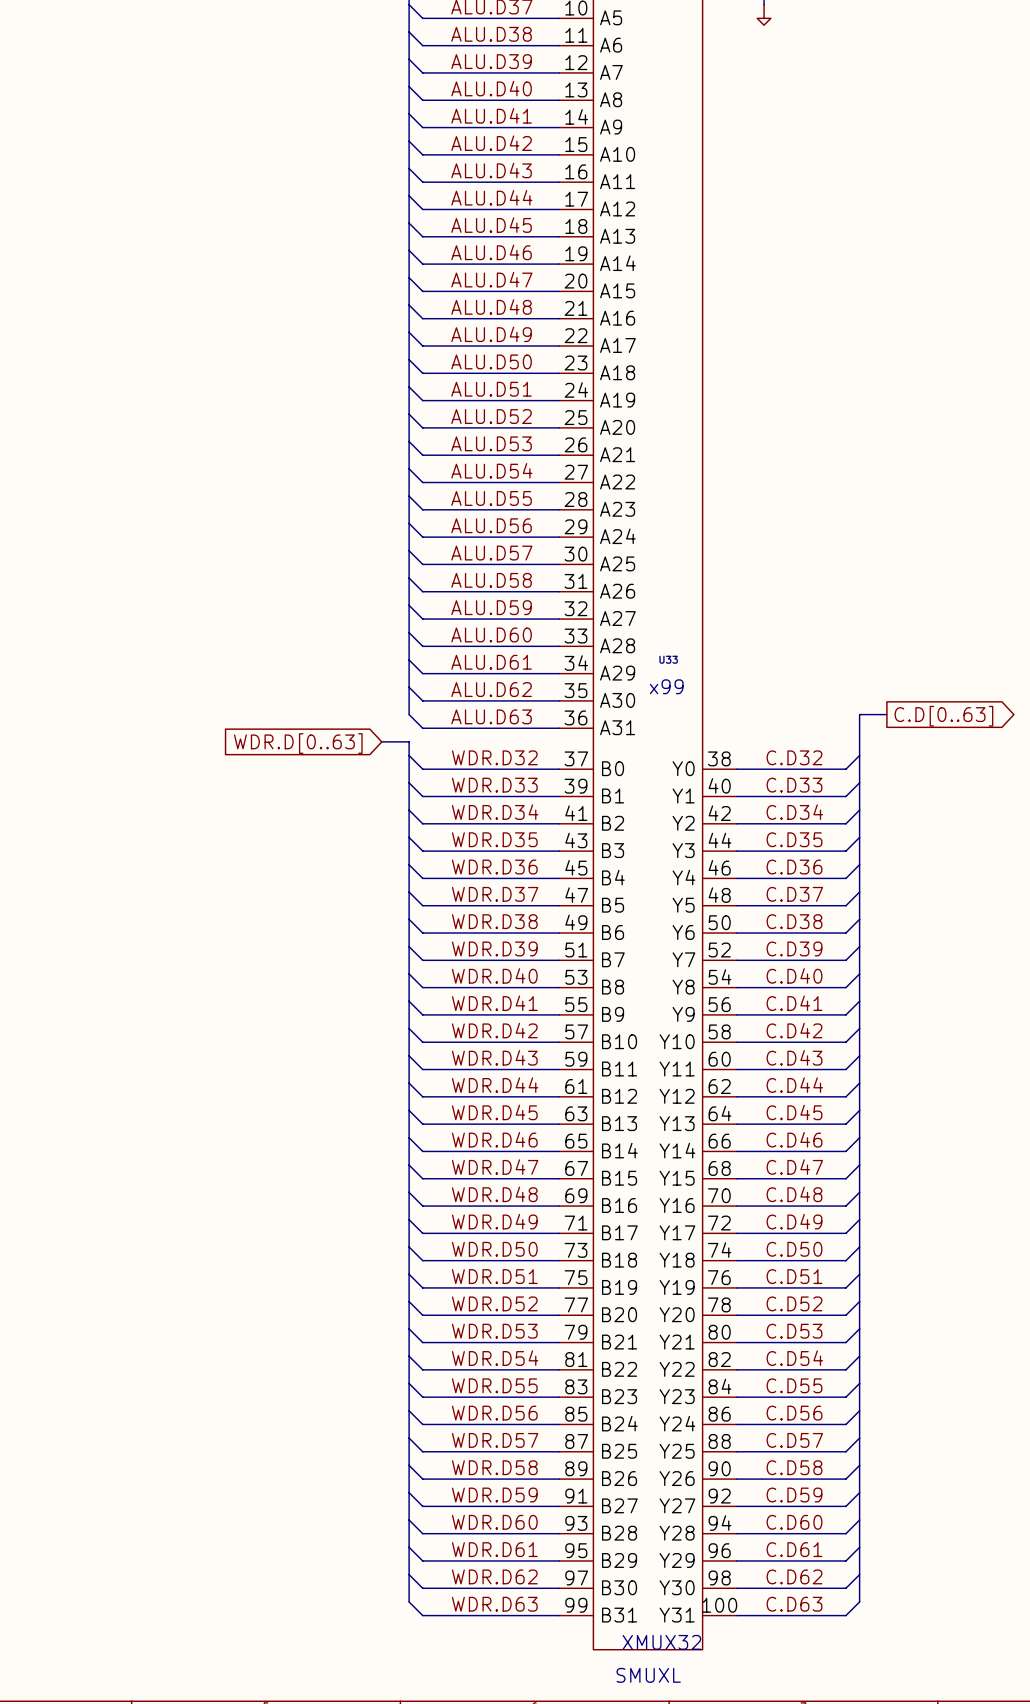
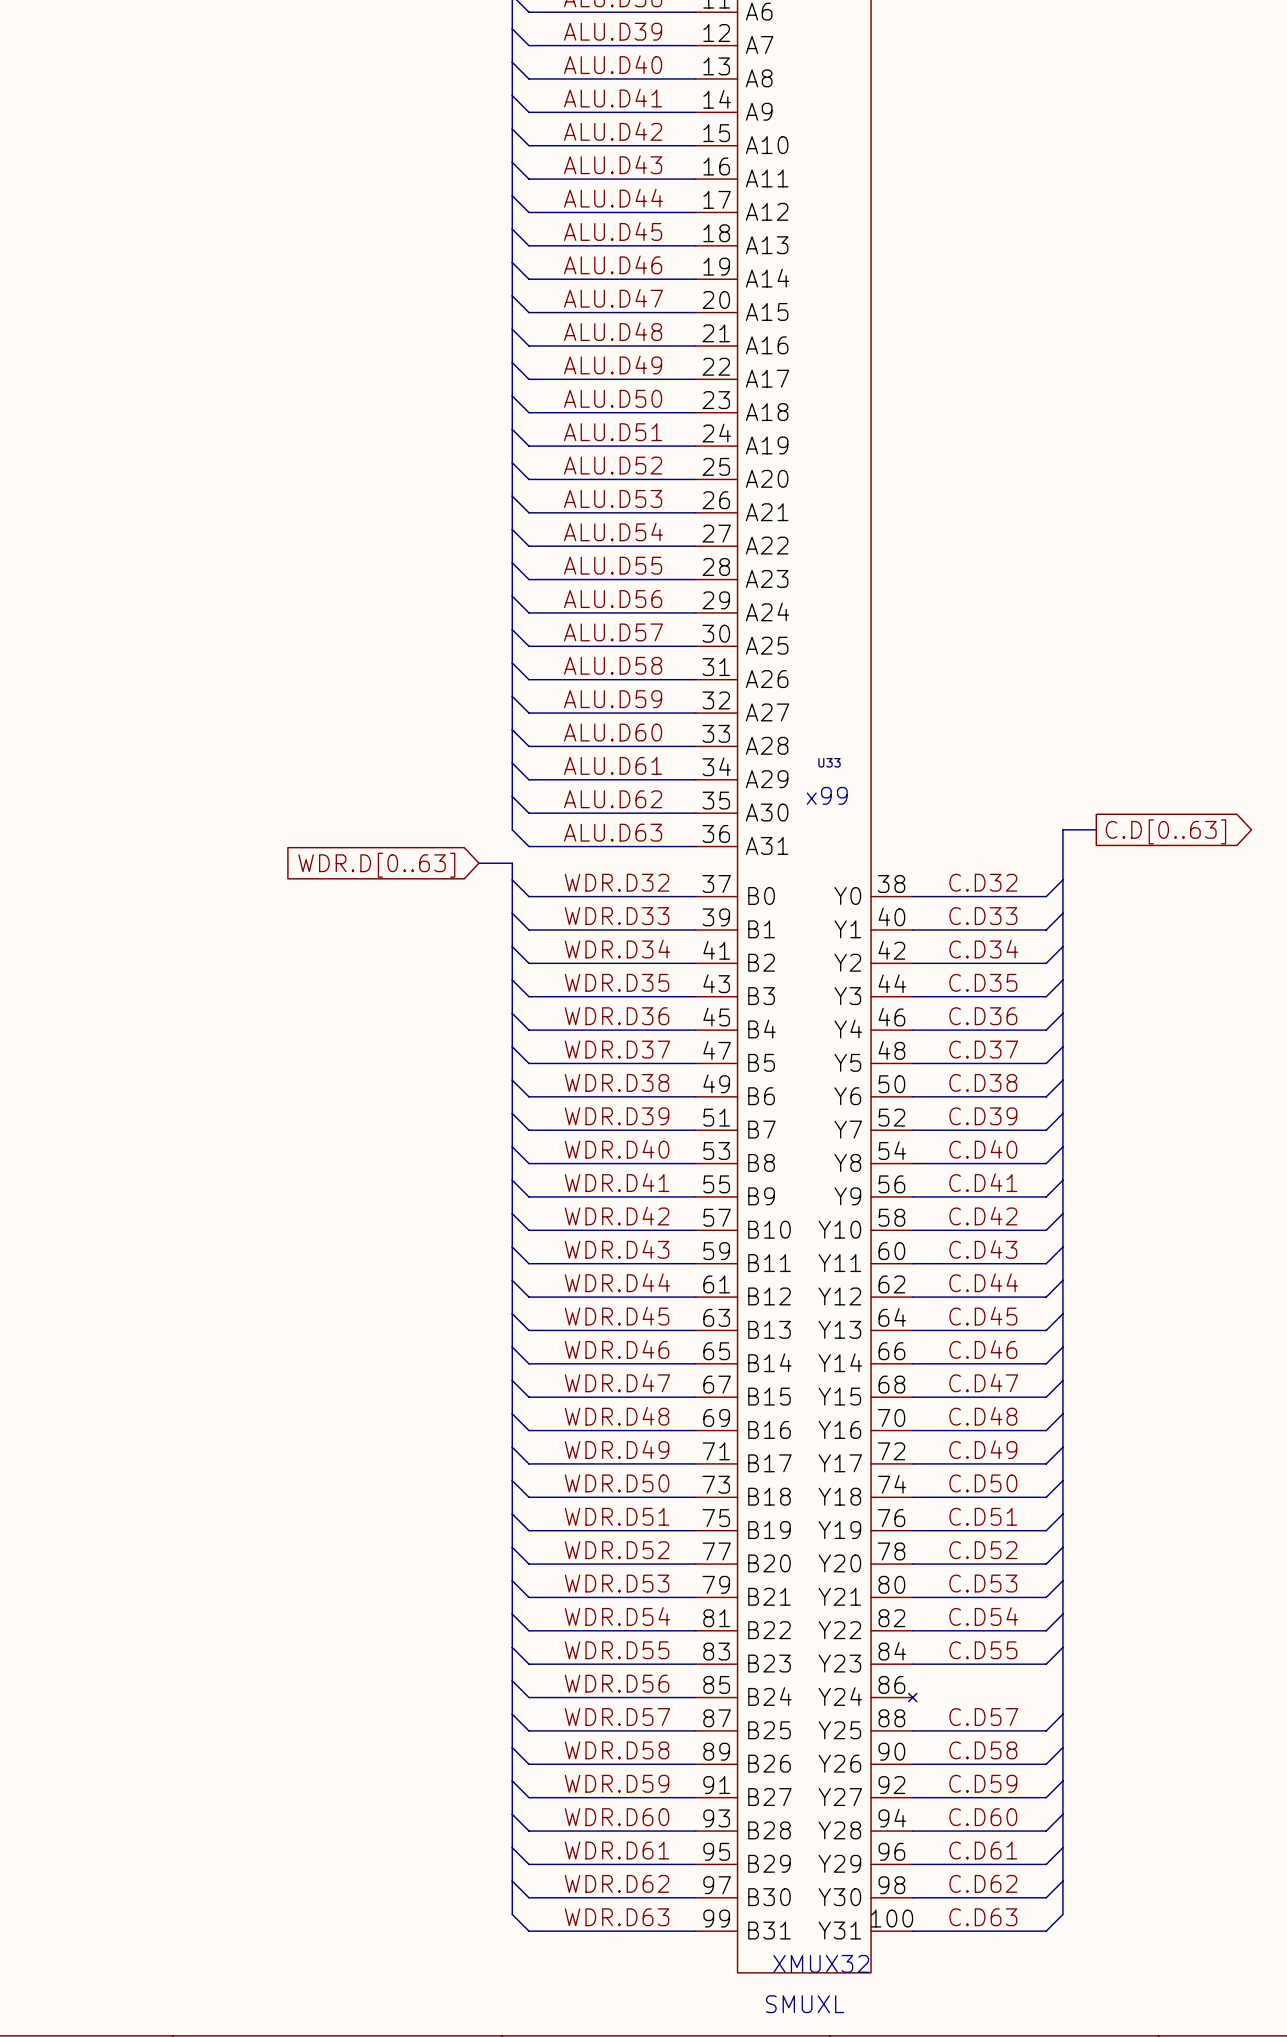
wire: (859, 1410) (845, 1424) (736, 1424) -> none
label: C.D56 (794, 1413) -> none
no-connect mark: none -> (912, 1697)

